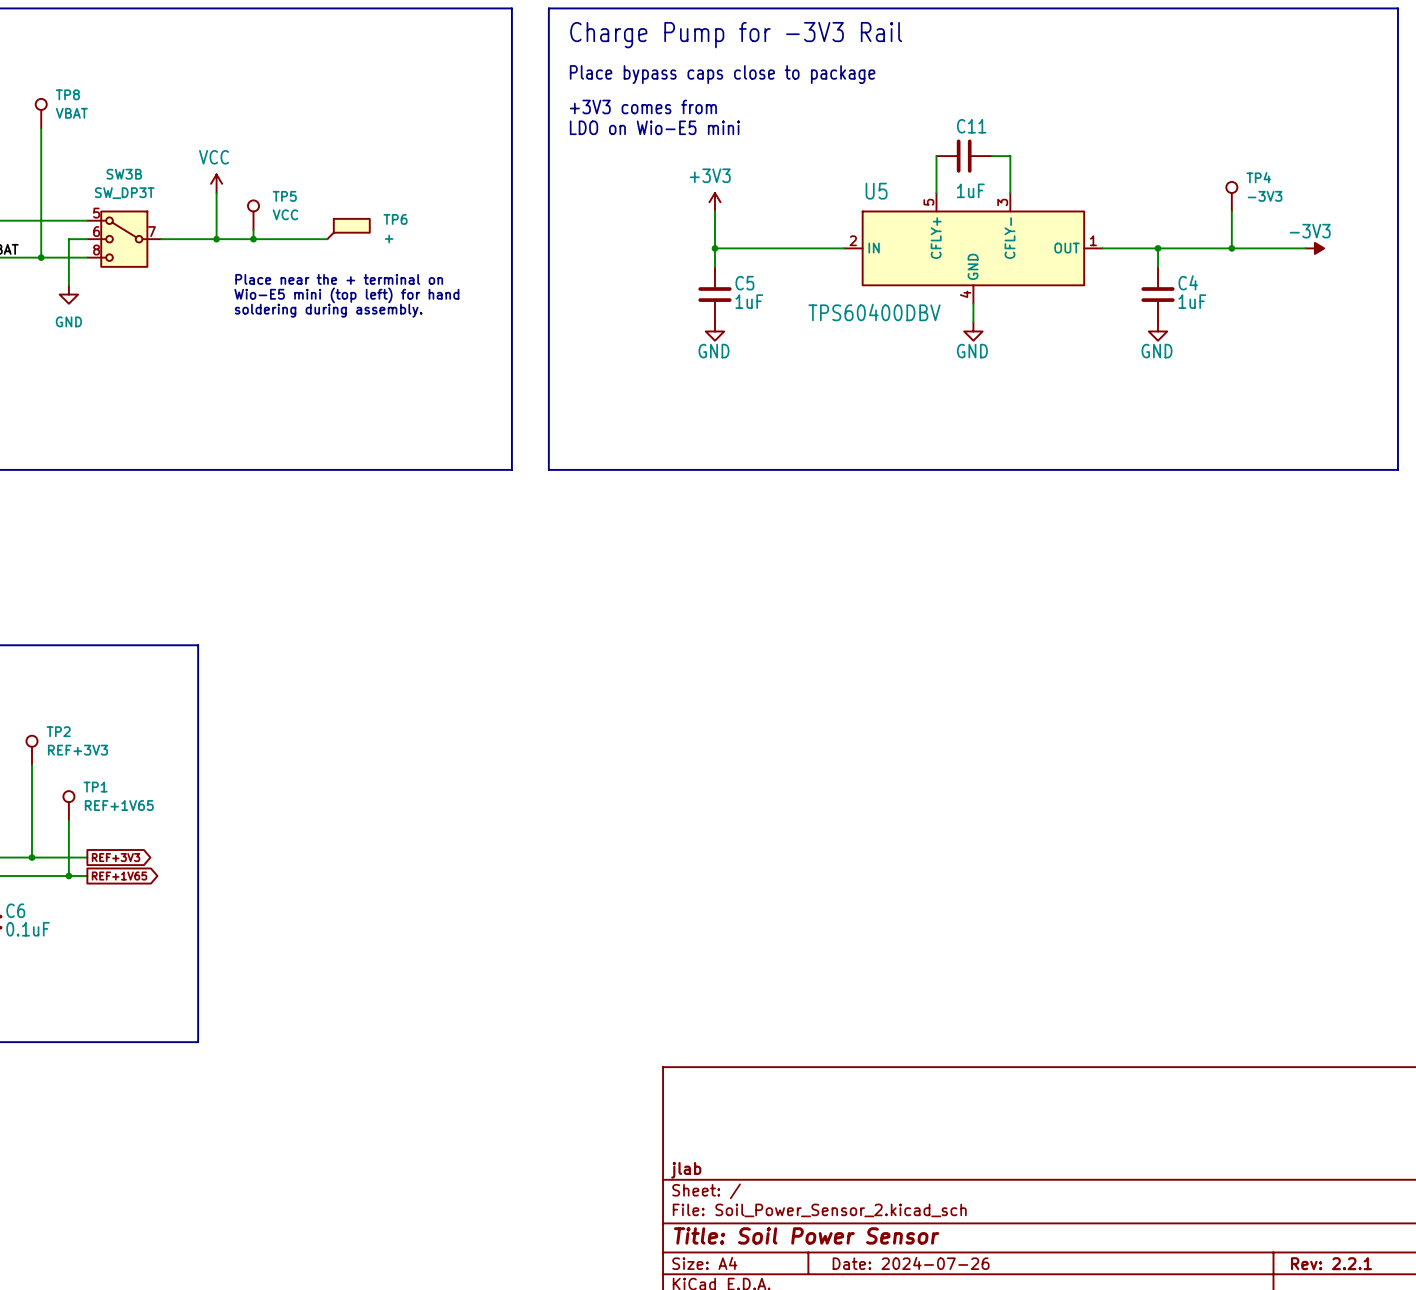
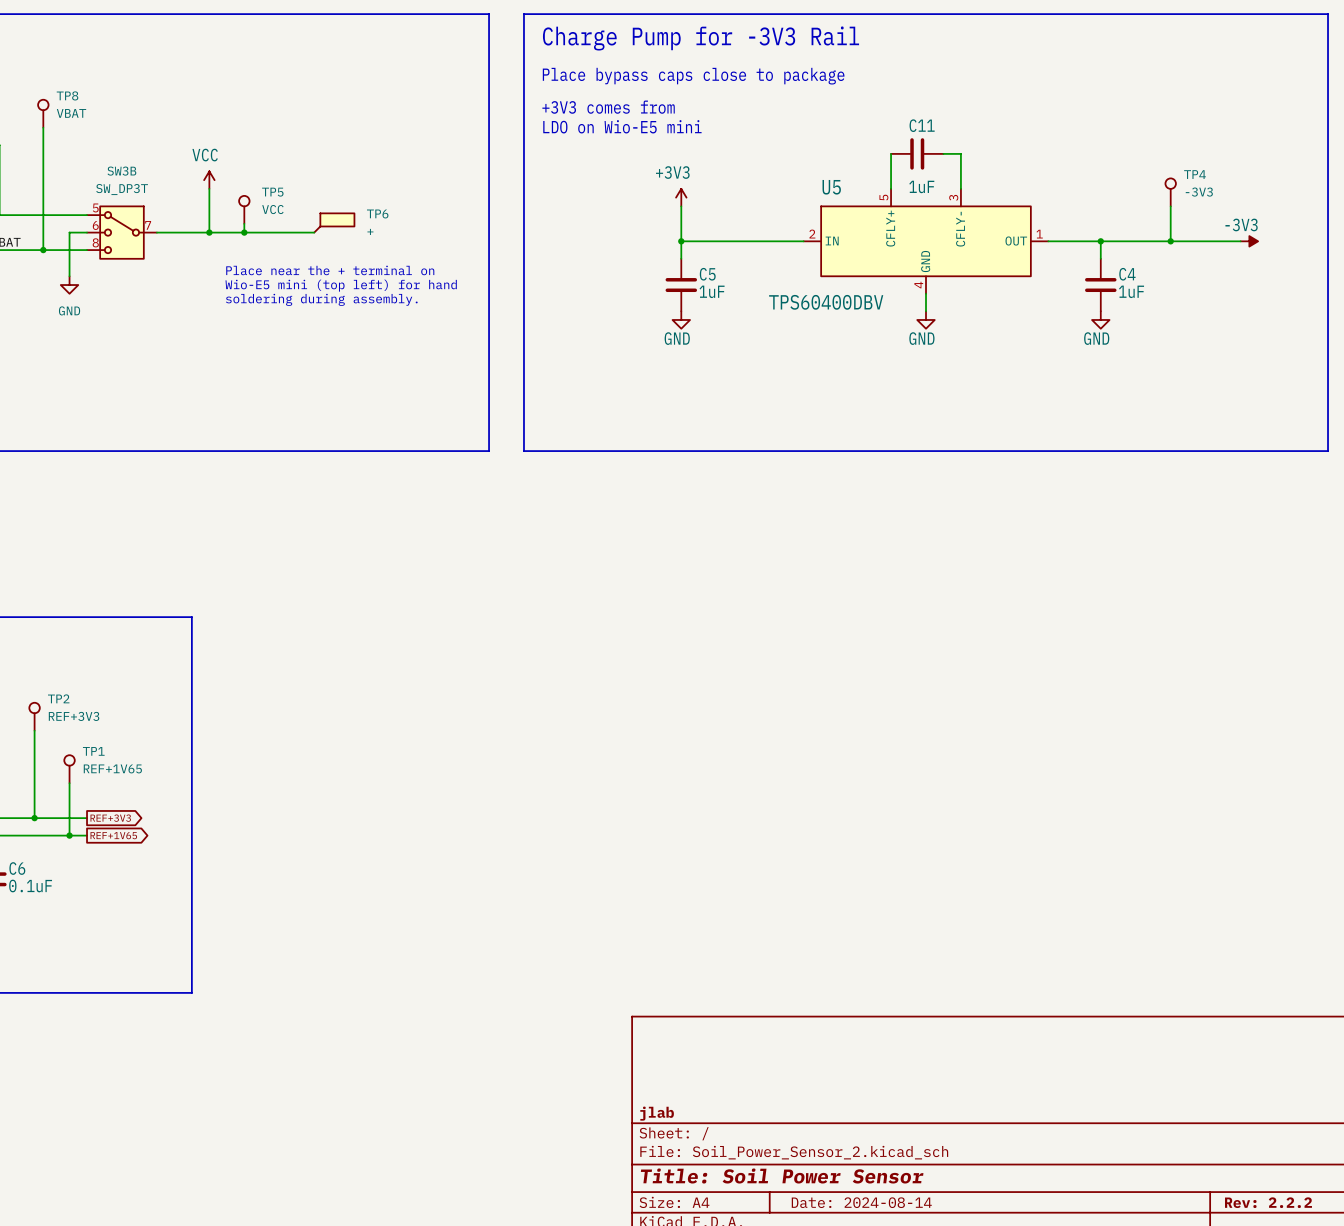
title block: Date: 2024-07-26 (911, 1263) -> Date: 2024-08-14 (861, 1202)
title block: Rev: 2.2.1 (1331, 1263) -> Rev: 2.2.2 (1268, 1202)

